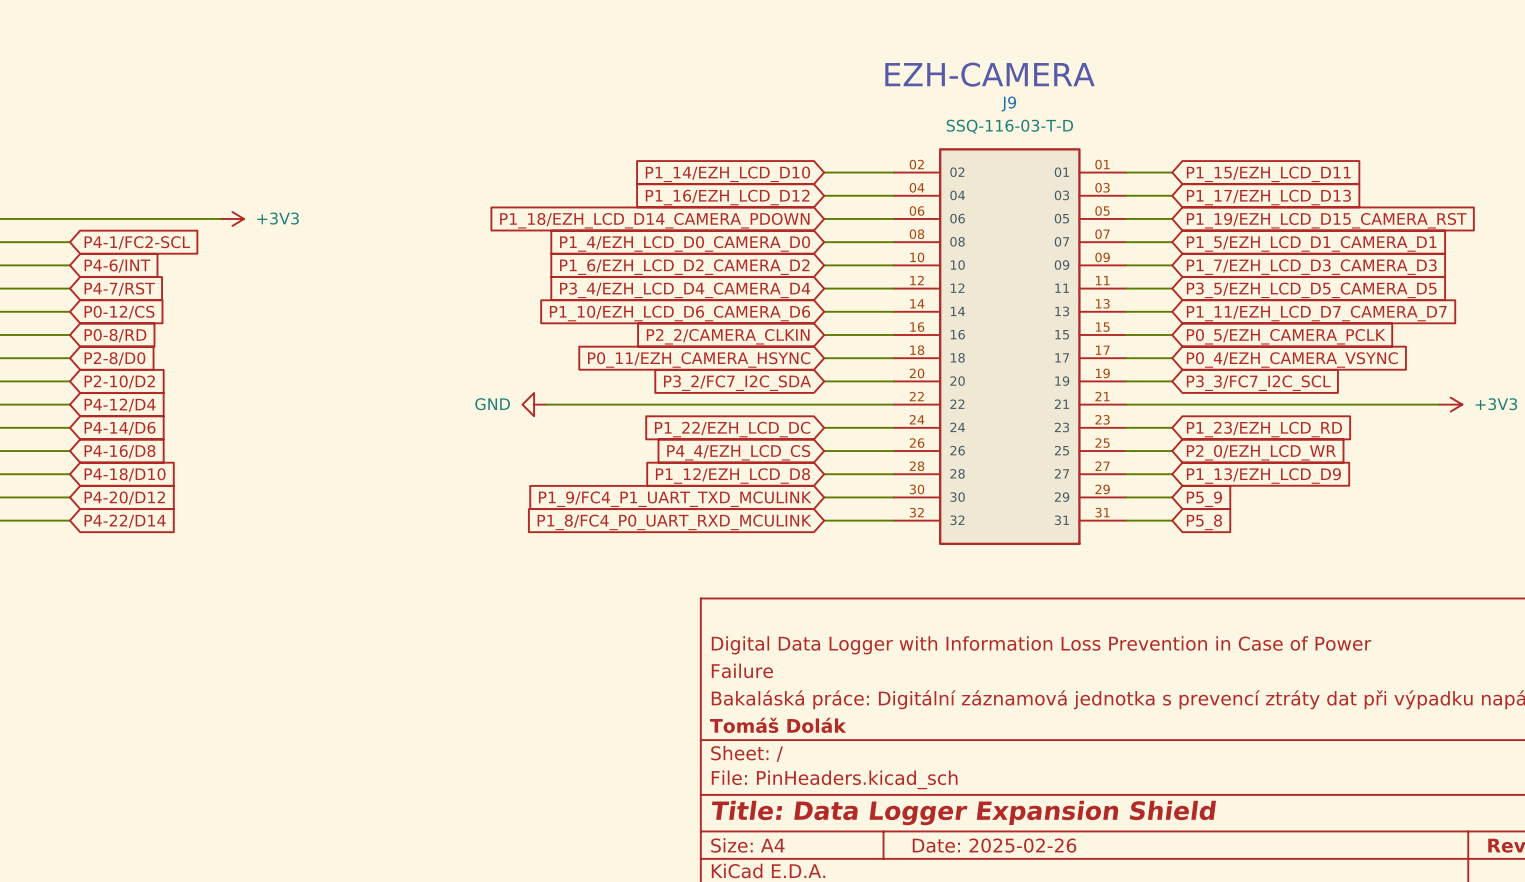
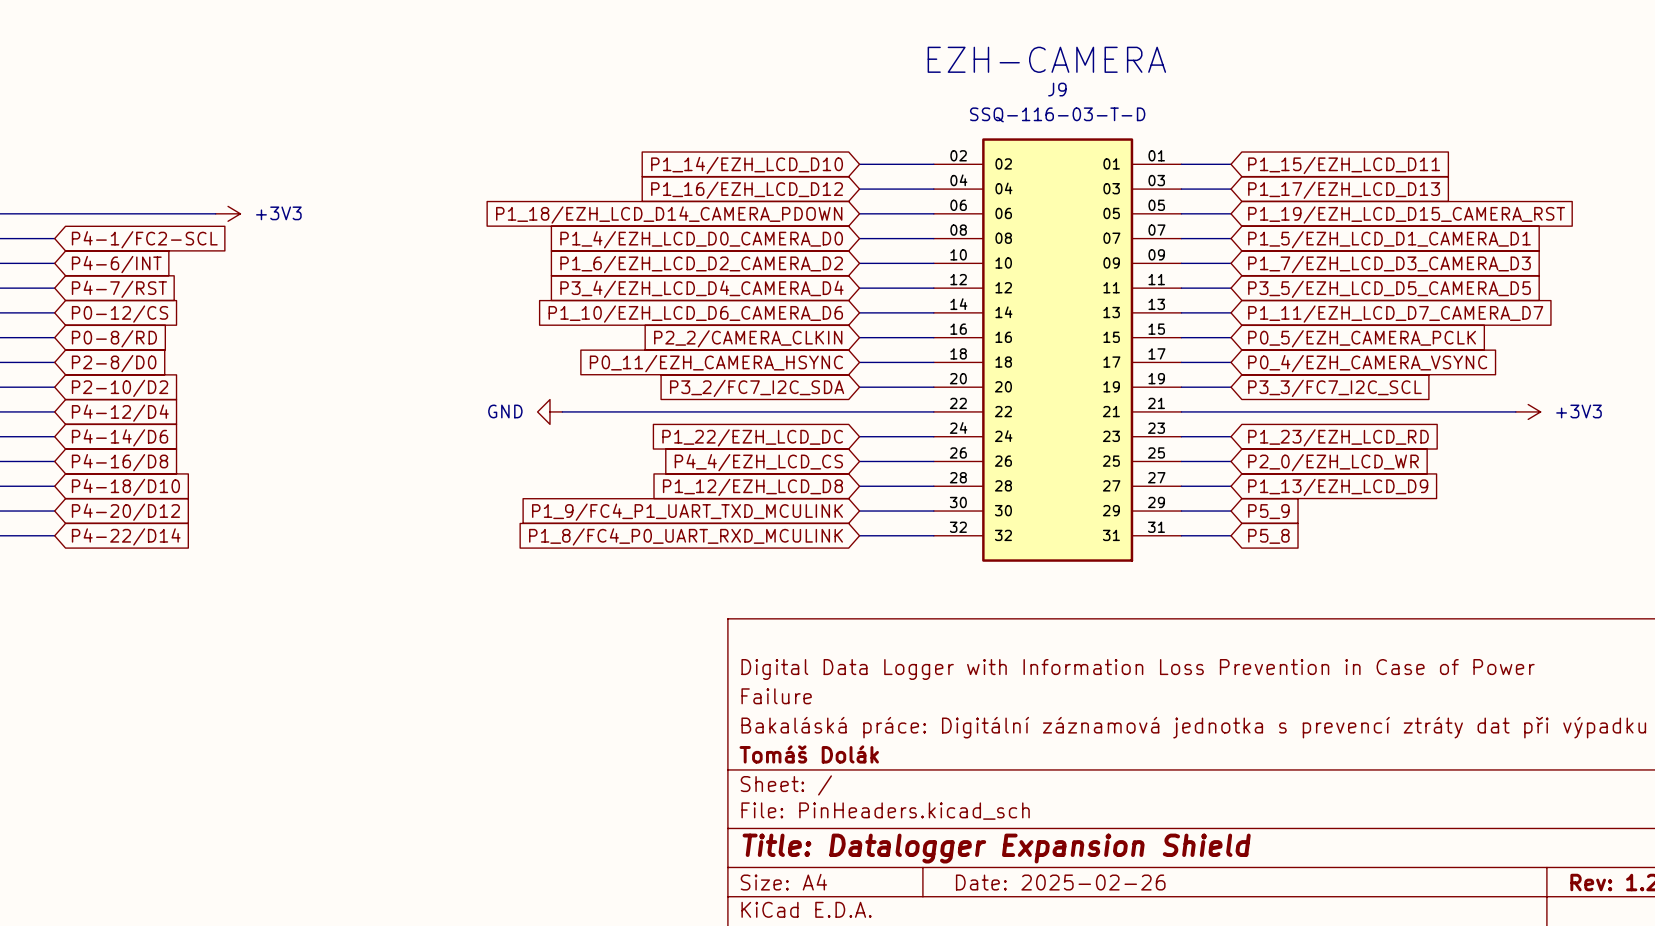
title block: Title: Data Logger Expansion Shield (963, 812) -> Title: Datalogger Expansion Shield (996, 848)

